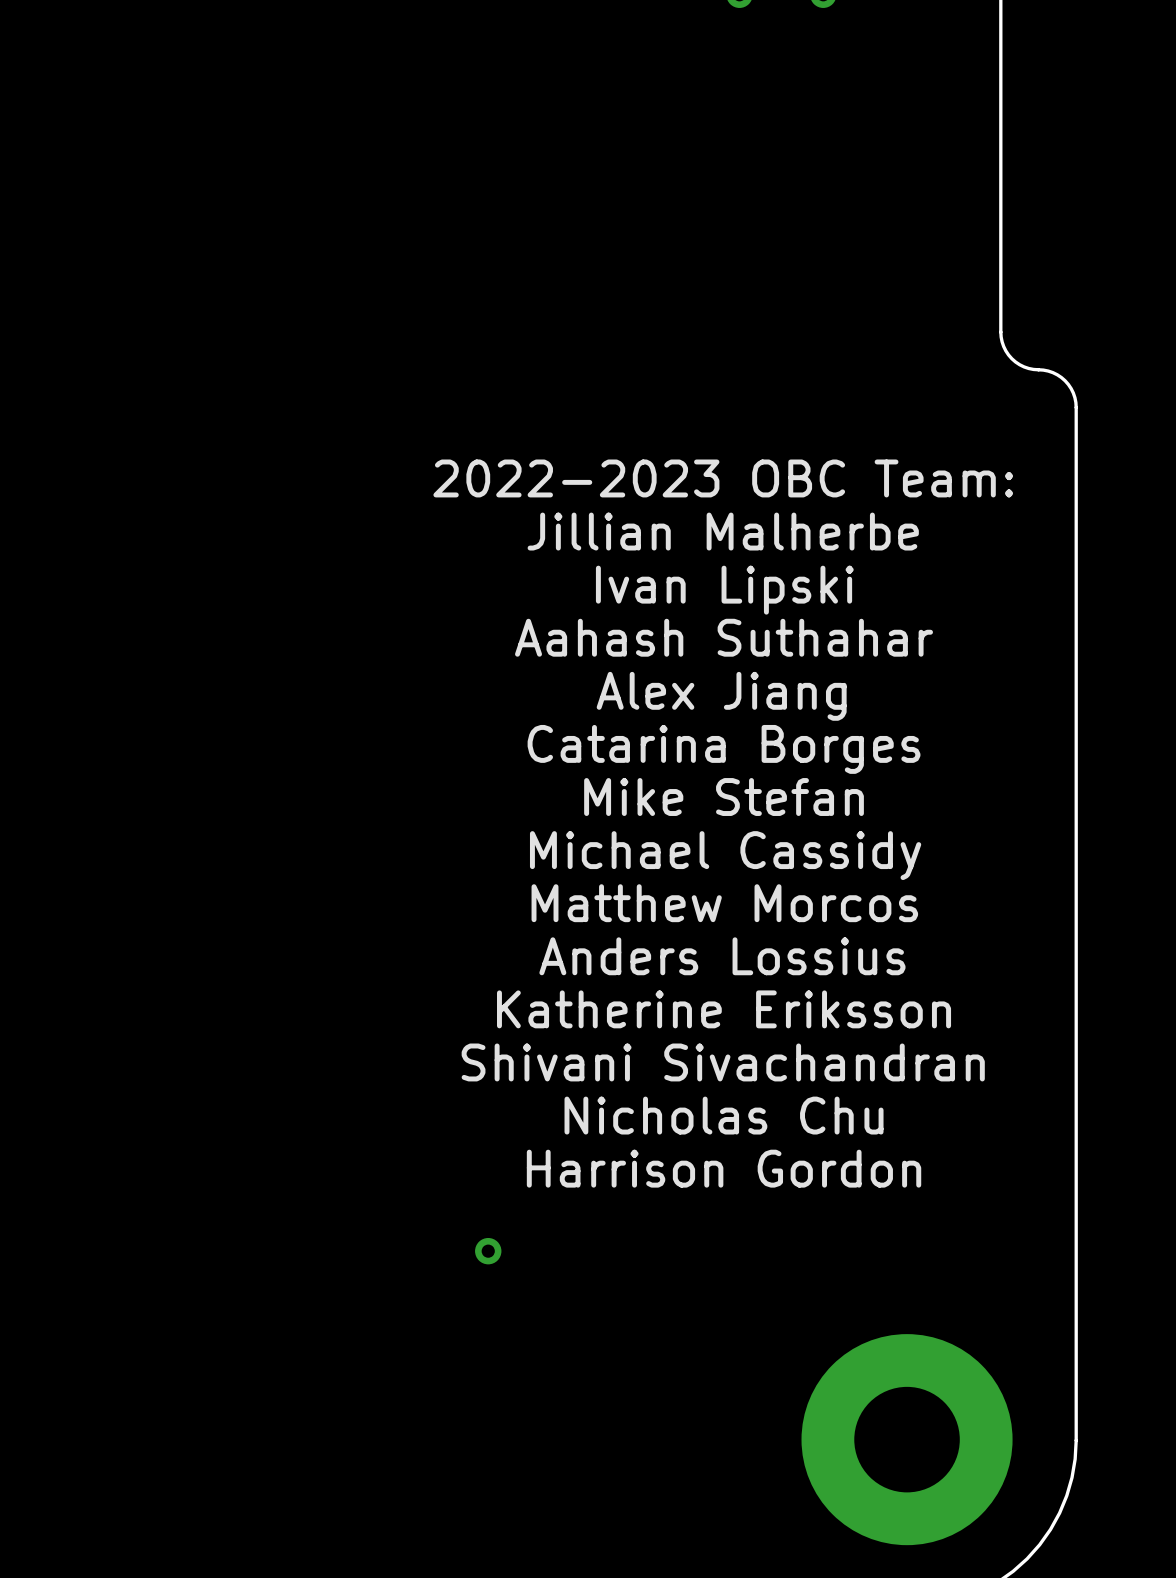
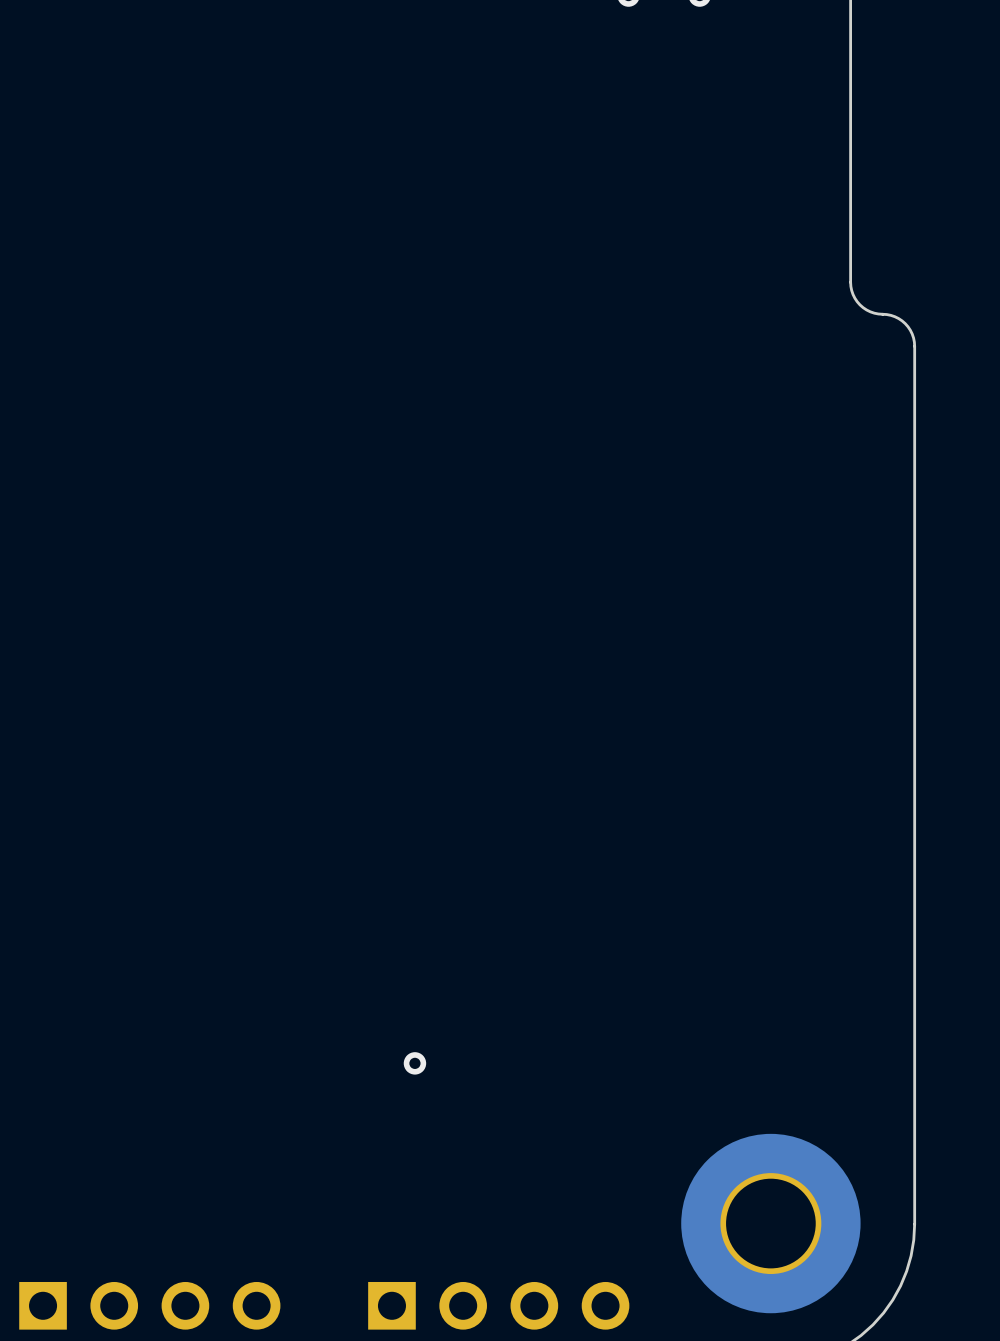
text: 2022-2023 OBC Team: (723, 478) -> none
text: Jillian Malherbe (723, 531) -> none
text: Ivan Lipski (724, 590) -> none
text: Aahash Suthahar (724, 637) -> none
text: Alex Jiang (721, 696) -> none
text: Catarina Borges (724, 749) -> none
text: Mike Stefan (724, 797) -> none
text: Michael Cassidy (725, 855) -> none
text: Matthew Morcos (724, 903) -> none
text: Anders Lossius (722, 956) -> none
text: Katherine Eriksson (724, 1009) -> none
text: Shivani Sivachandran (723, 1062) -> none
text: Nicholas Chu (724, 1115) -> none
text: Harrison Gordon (724, 1168) -> none
part footprint: [801, 1334, 1013, 1546] -> [681, 1133, 861, 1314]
part: none -> (149, 1305)
part: none -> (498, 1305)

